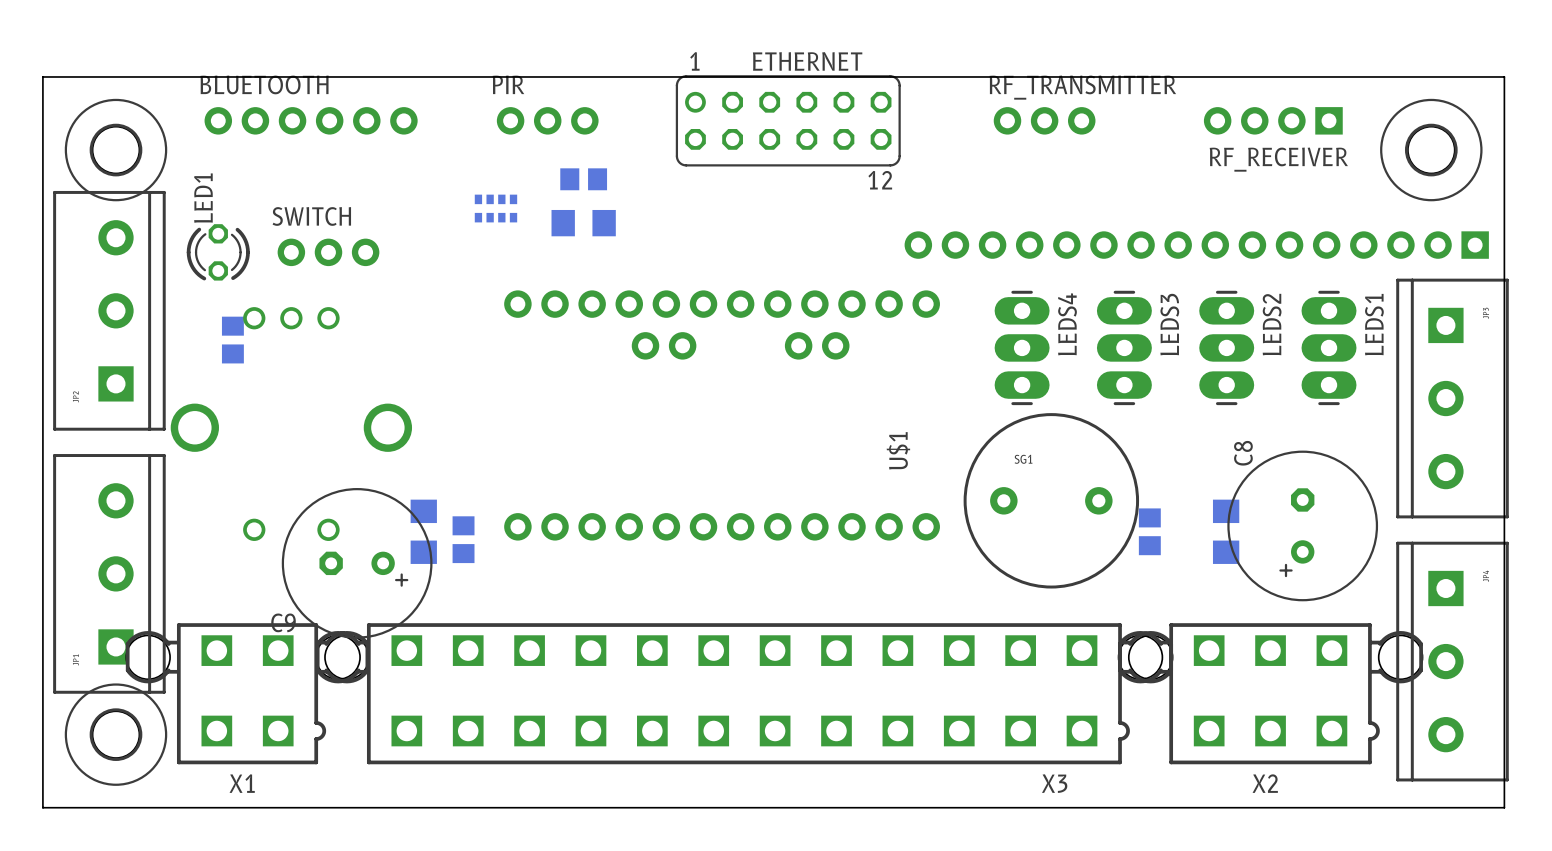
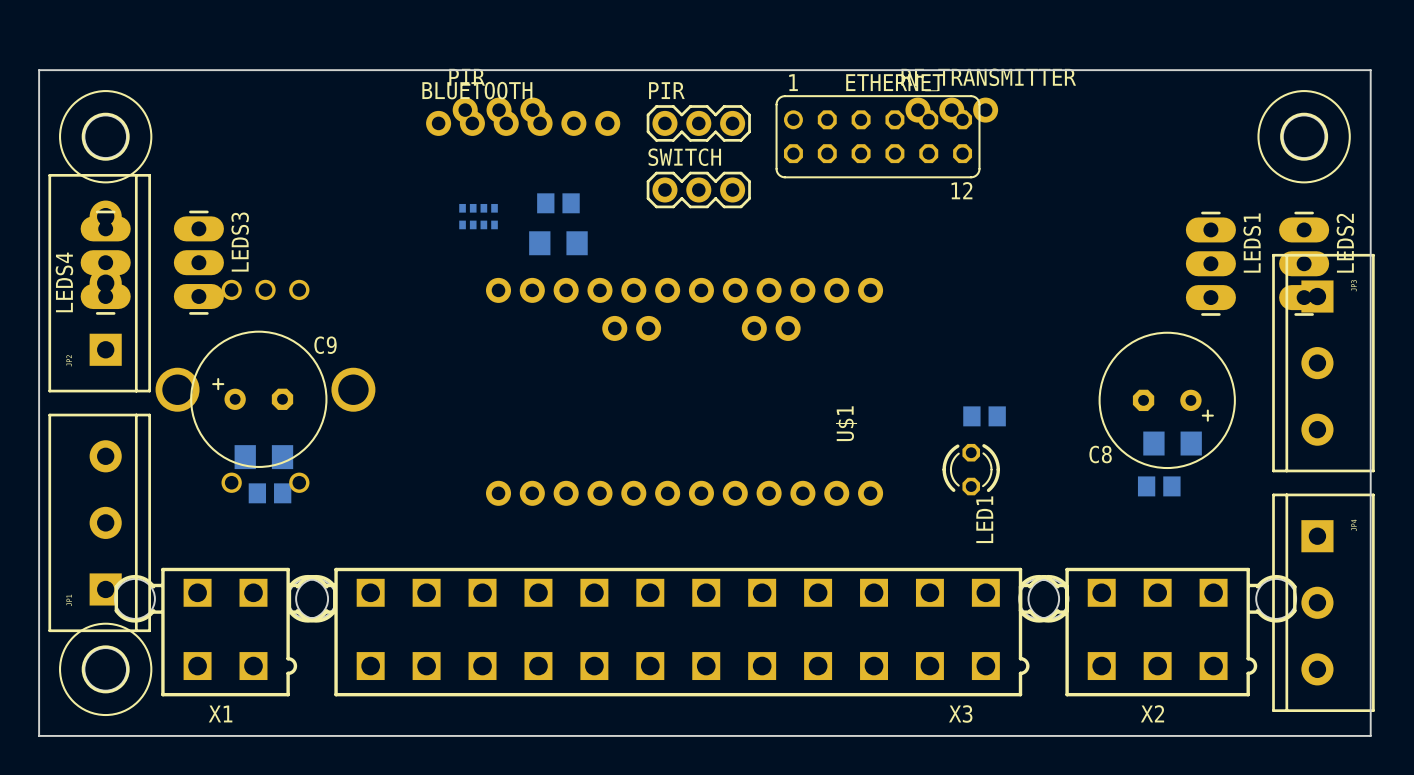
BLUETOOTH position: (311, 120) -> (523, 123)
ETHERNET position: (788, 120) -> (878, 136)
RF_RECEIVER: (1273, 120) -> none
PIR: none -> (698, 123)
part position: (583, 179) -> (558, 203)
part position: (495, 208) -> (478, 216)
SWITCH: none -> (698, 189)
part position: (583, 223) -> (558, 243)
part: (1196, 245) -> none
LED1 rotation: 0° (218, 252) -> 180° (971, 469)
LED1 position: (218, 252) -> (971, 469)
SWITCH: (328, 252) -> none
LEDS4 name position: LEDS4 (1067, 324) -> LEDS4 (64, 282)
part: (232, 340) -> none
LEDS4 position: (1022, 347) -> (105, 262)
LEDS3 position: (1124, 347) -> (198, 262)
LEDS2 position: (1226, 347) -> (1304, 263)
LEDS1 position: (1329, 347) -> (1210, 263)
U$1 position: (722, 415) -> (684, 391)
part: none -> (984, 416)
SG1: (1051, 500) -> none
C8 rotation: 0° (1302, 525) -> 90° counterclockwise (1167, 400)
part rotation: 0° (423, 531) -> 90° clockwise (263, 457)
part position: (423, 531) -> (263, 457)
part: (1149, 531) -> none
part rotation: 0° (1226, 531) -> 90° clockwise (1172, 443)
part position: (1226, 531) -> (1172, 443)
part: none -> (1159, 486)
part: (463, 539) -> none
part: none -> (270, 493)
C9 rotation: 0° (357, 563) -> 180° (258, 399)
C9 position: (357, 563) -> (258, 399)

